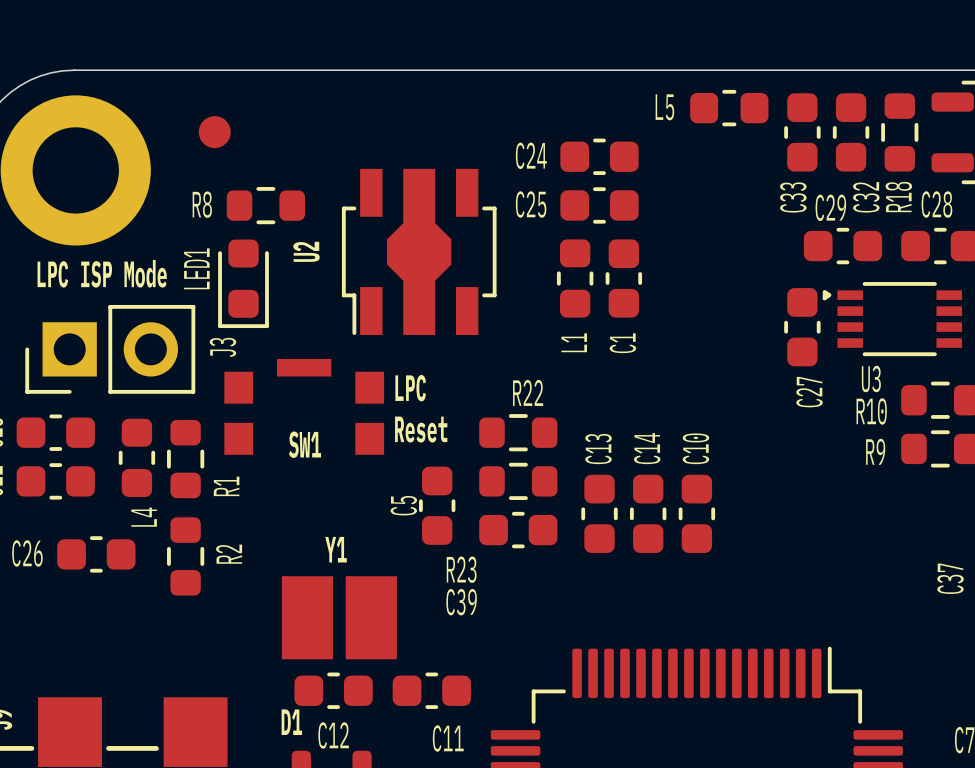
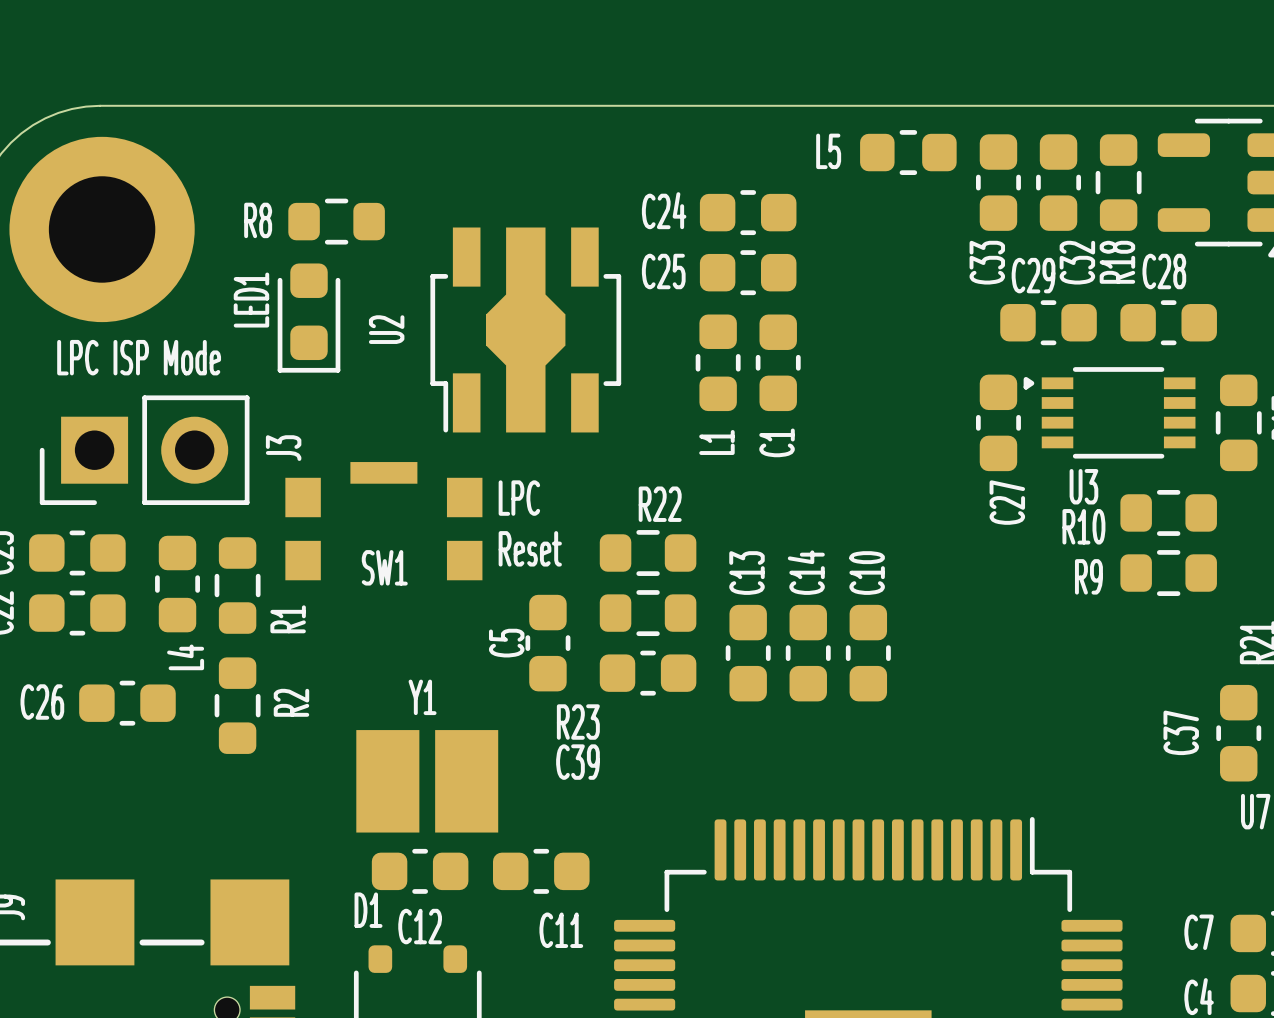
part: (214, 132) -> none
R8 position: (265, 205) -> (336, 221)
LED1 position: (243, 283) -> (309, 318)

